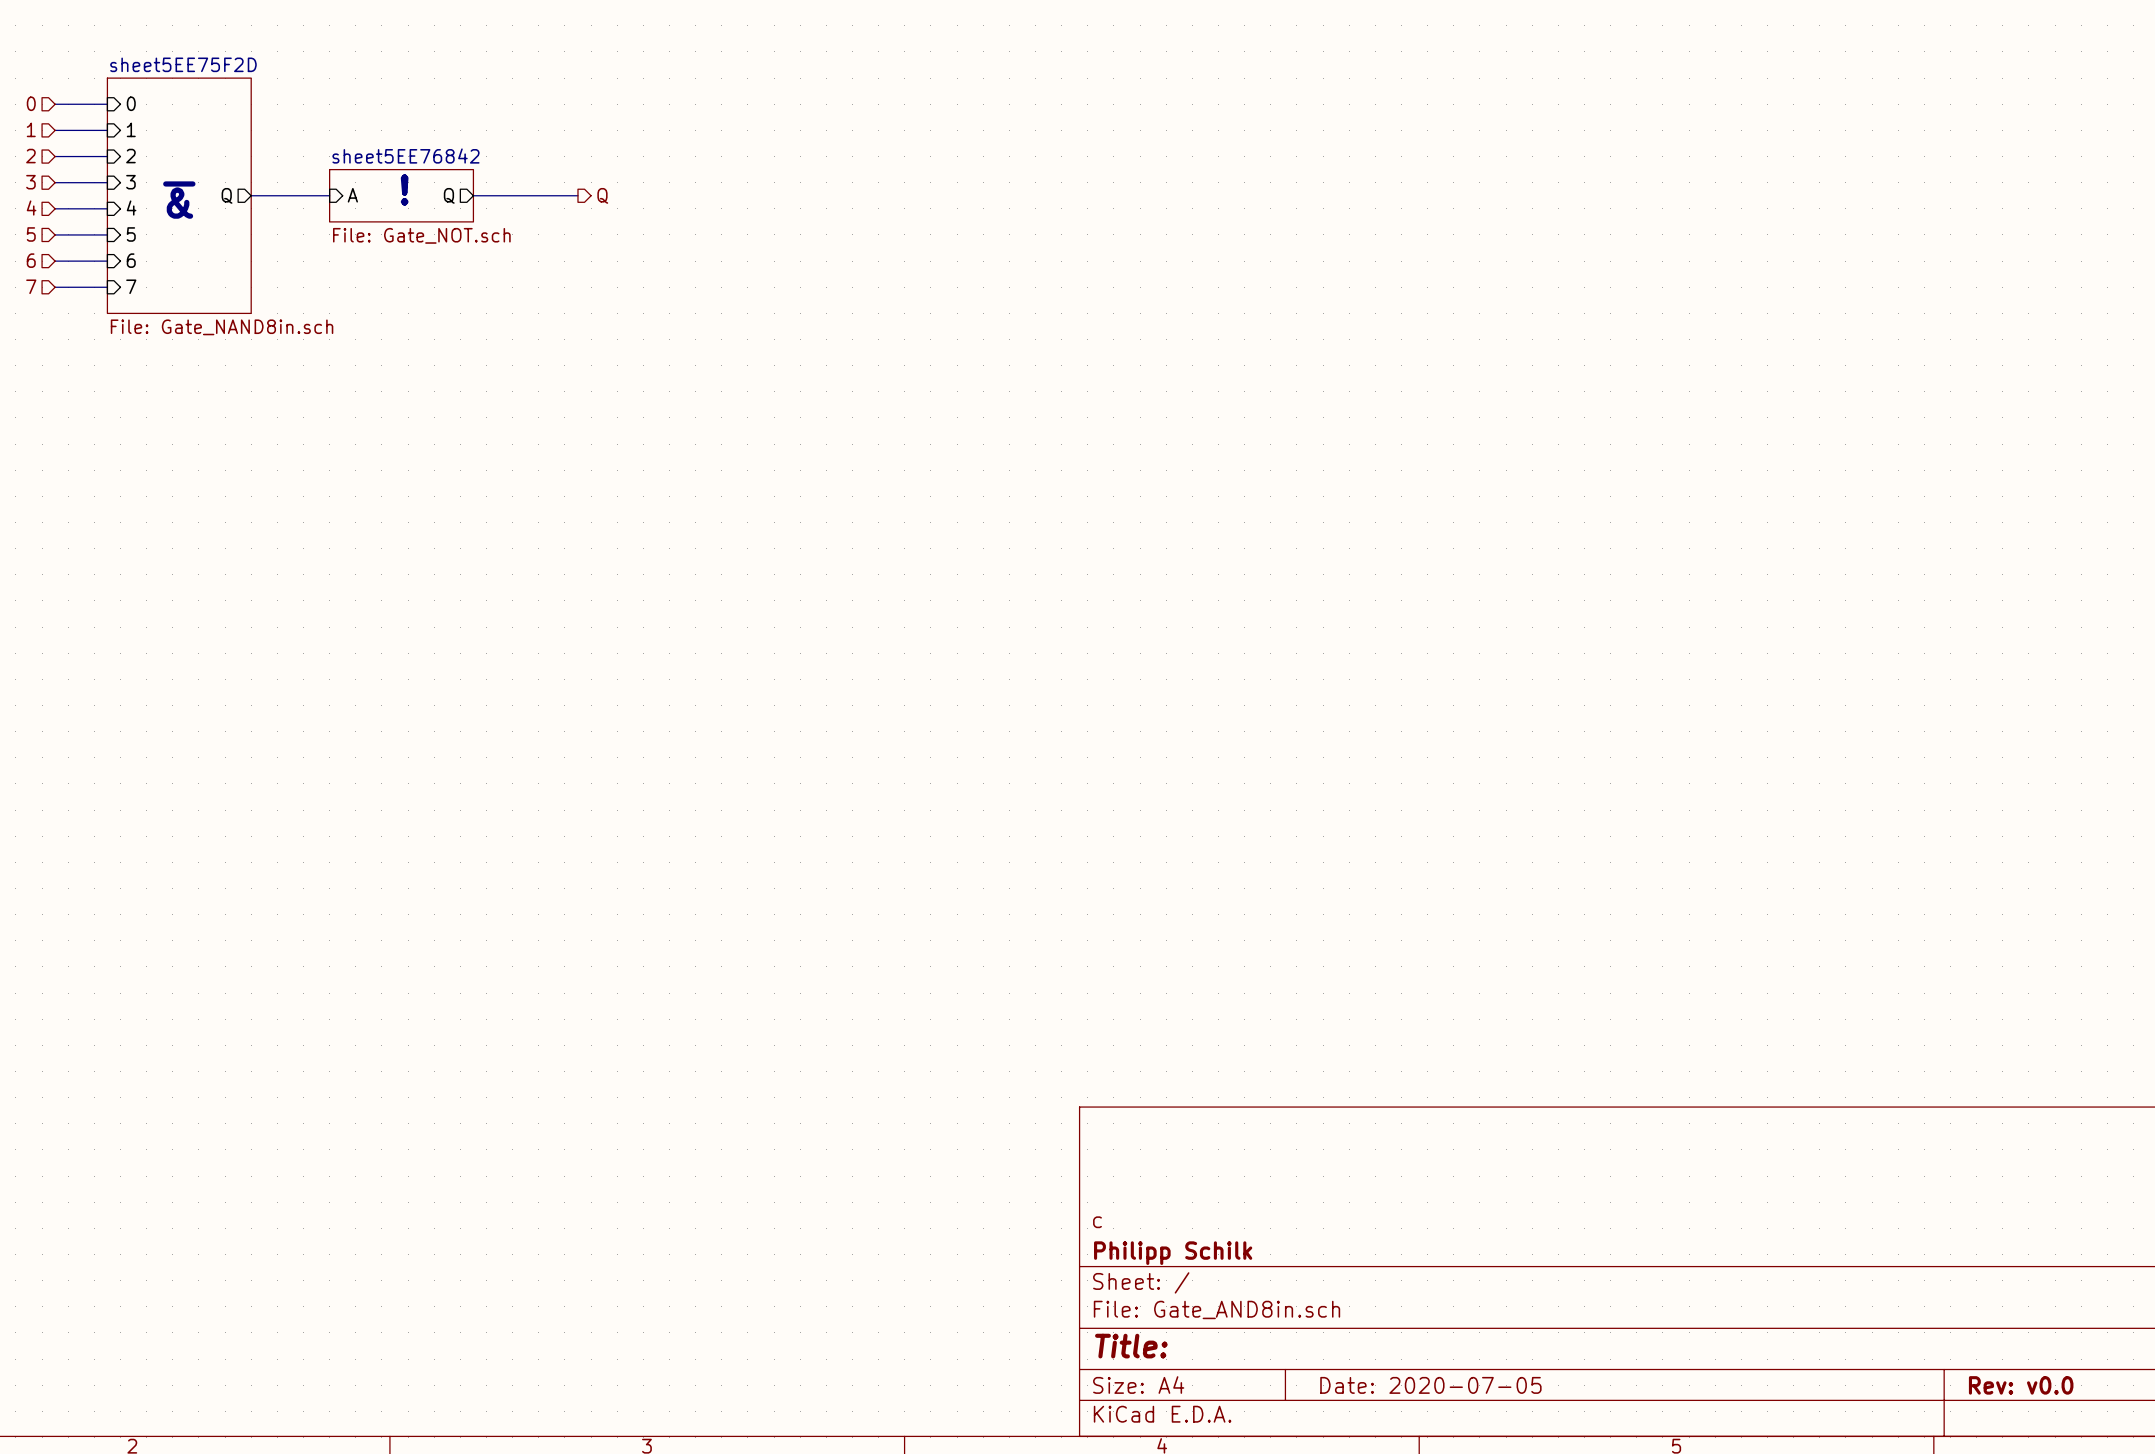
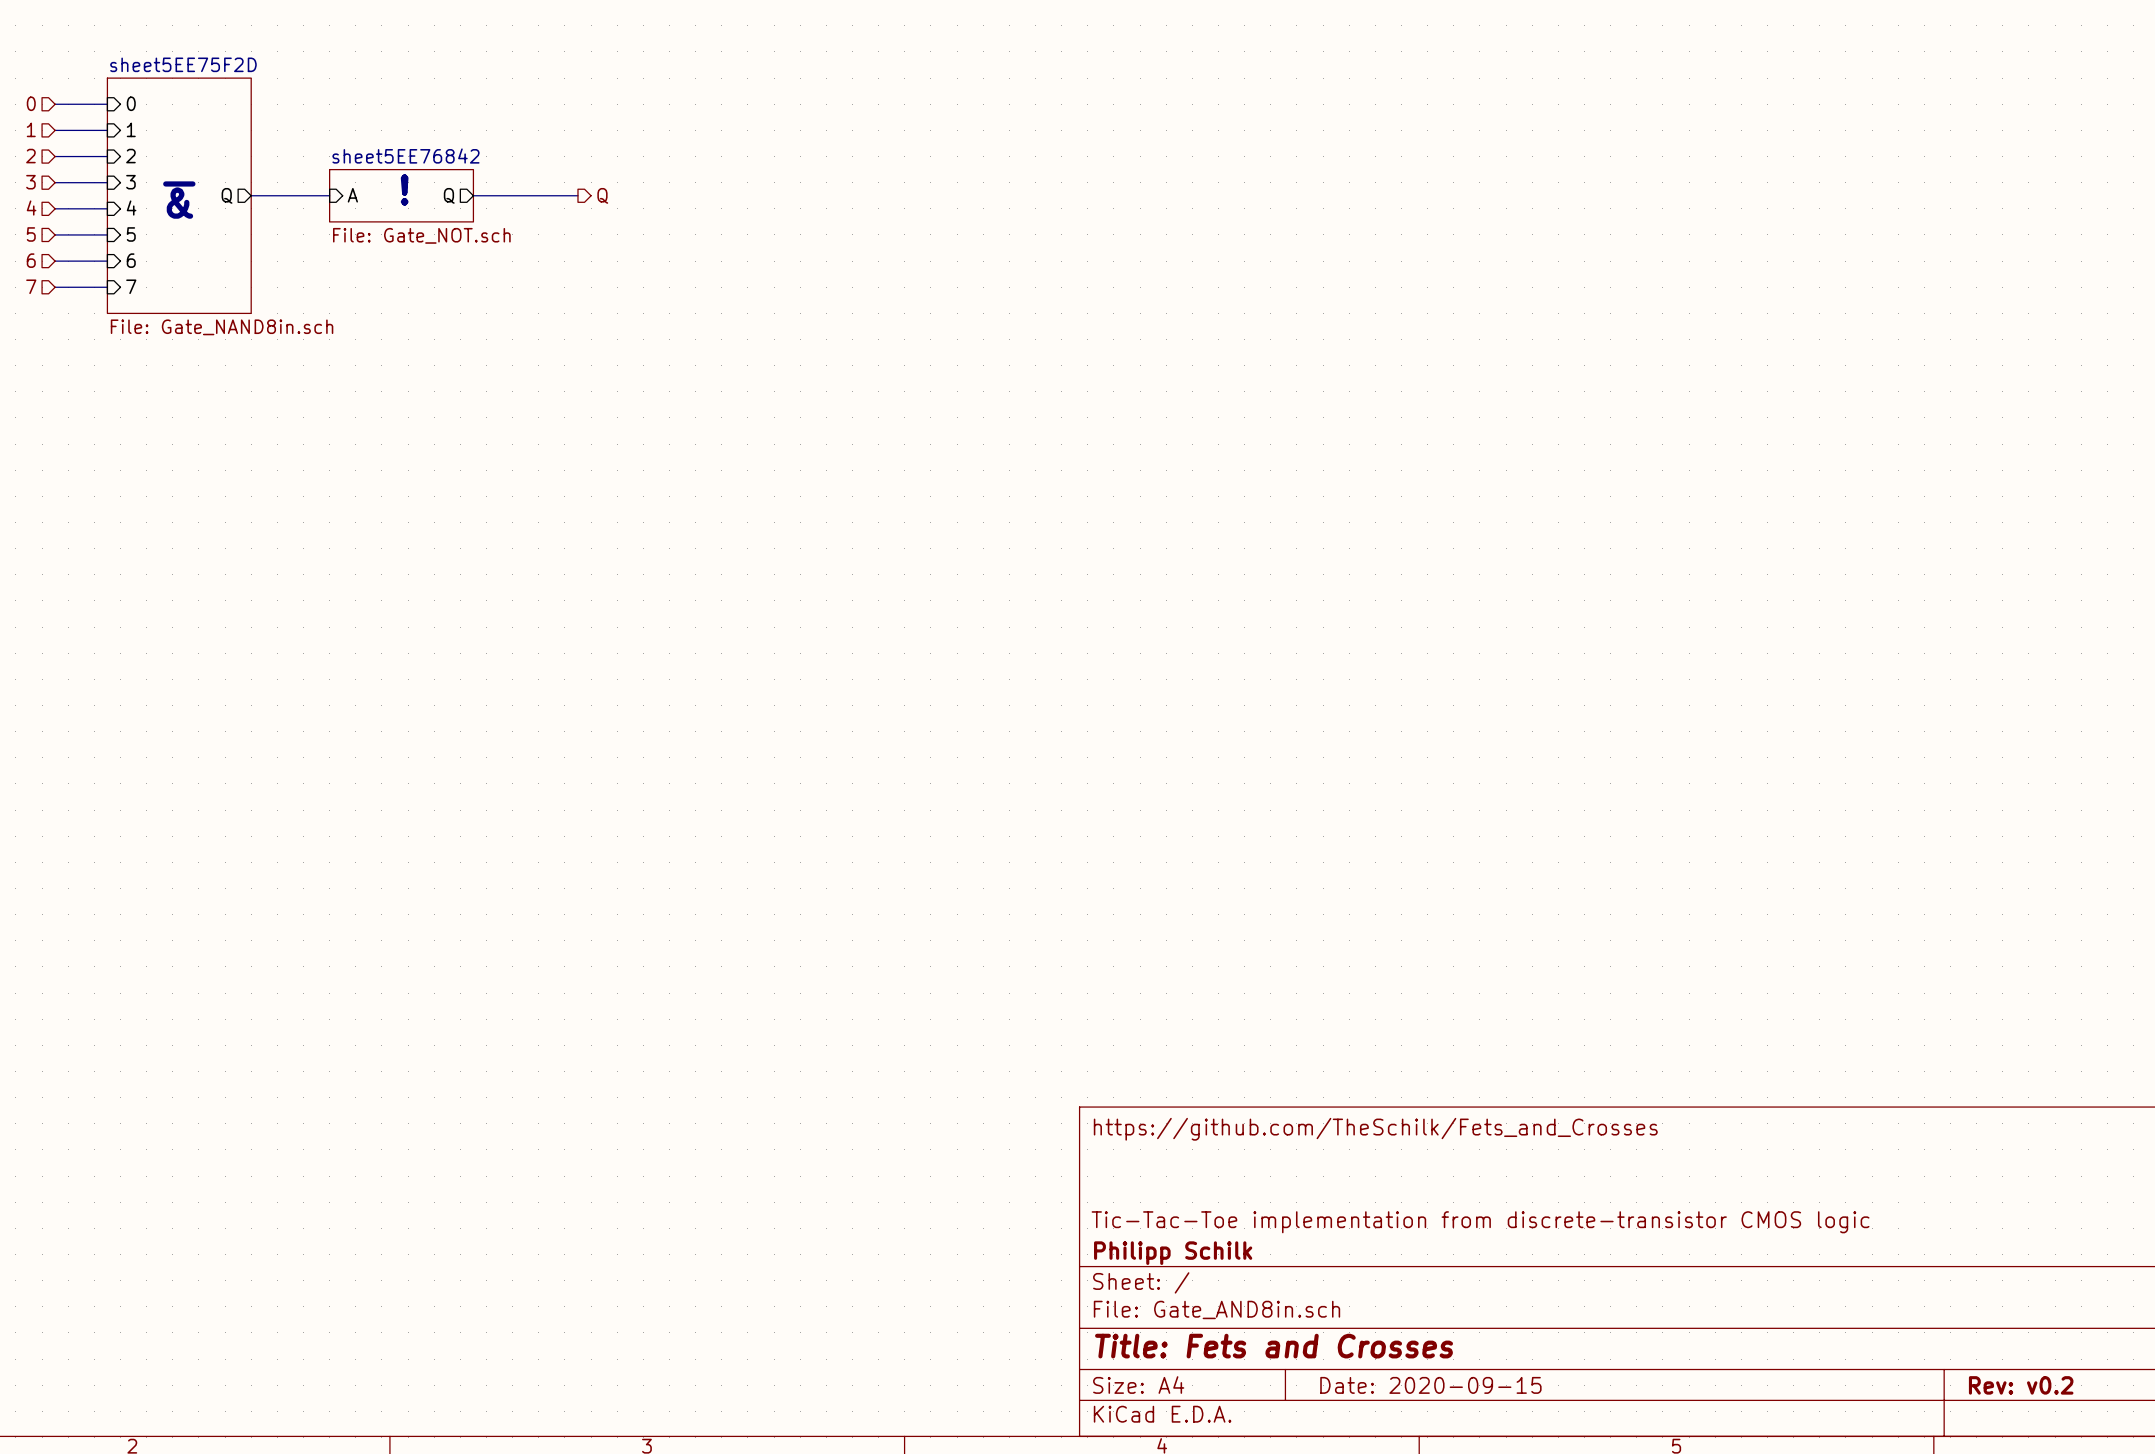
title block: none -> https://github.com/TheSchilk/Fets_and_Crosses (1375, 1129)
title block: c (1097, 1222) -> Tic-Tac-Toe implementation from discrete-transistor CMOS logic (1480, 1222)
title block: Title: (1131, 1346) -> Title: Fets and Crosses (1274, 1346)
title block: Date: 2020-07-05 (1430, 1385) -> Date: 2020-09-15 (1430, 1385)
title block: Rev: v0.0 (2021, 1385) -> Rev: v0.2 (2021, 1385)

